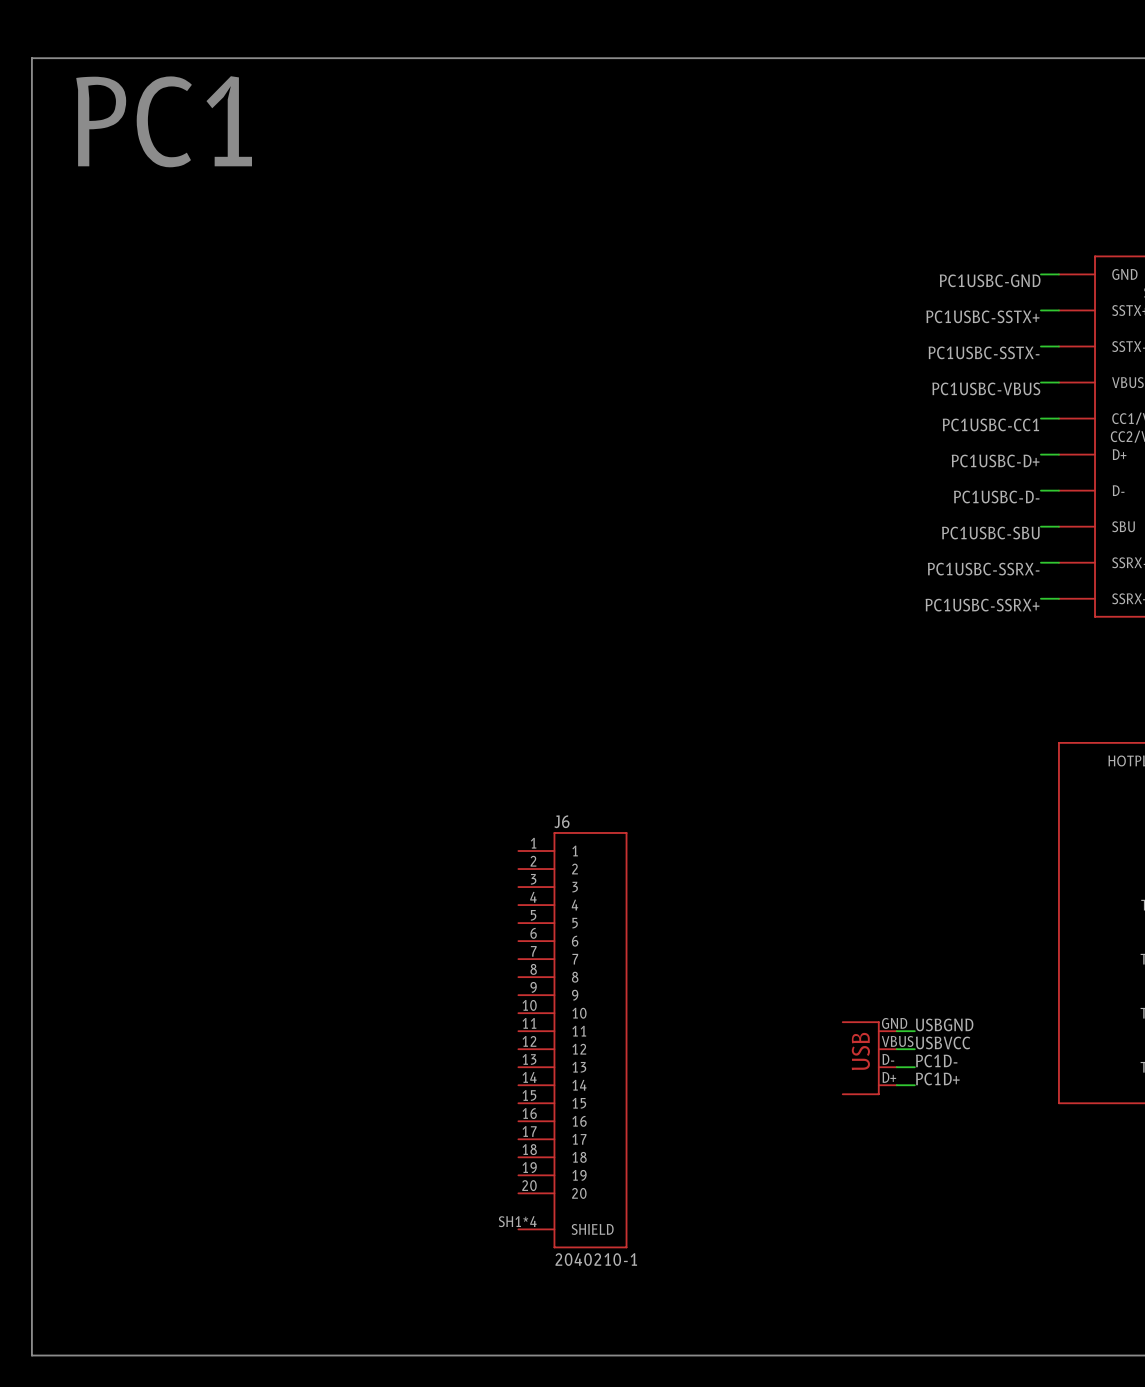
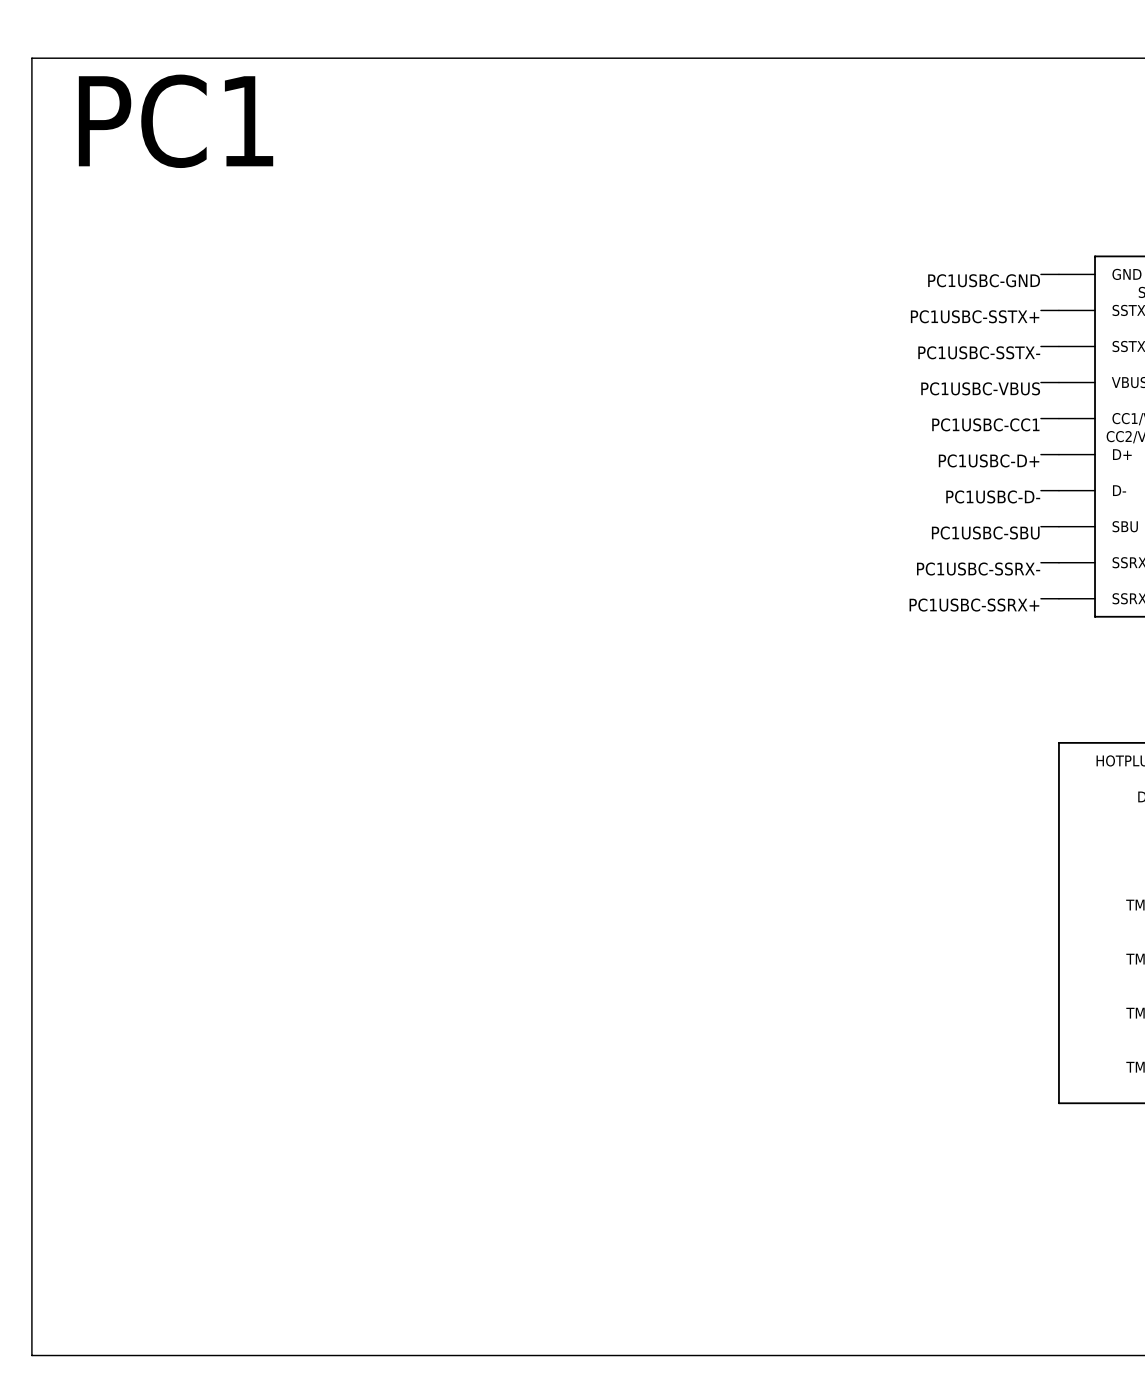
label: USBGND (944, 1024) -> none
wire: (896, 1031) (914, 1031) -> none
J6: 2040210-1 (572, 1040) -> none
label: USBVCC (943, 1042) -> none
wire: (896, 1049) (914, 1049) -> none
part: (869, 1058) -> none
label: PC1D- (936, 1060) -> none
wire: (896, 1067) (914, 1067) -> none
label: PC1D+ (937, 1079) -> none
wire: (896, 1085) (914, 1085) -> none

